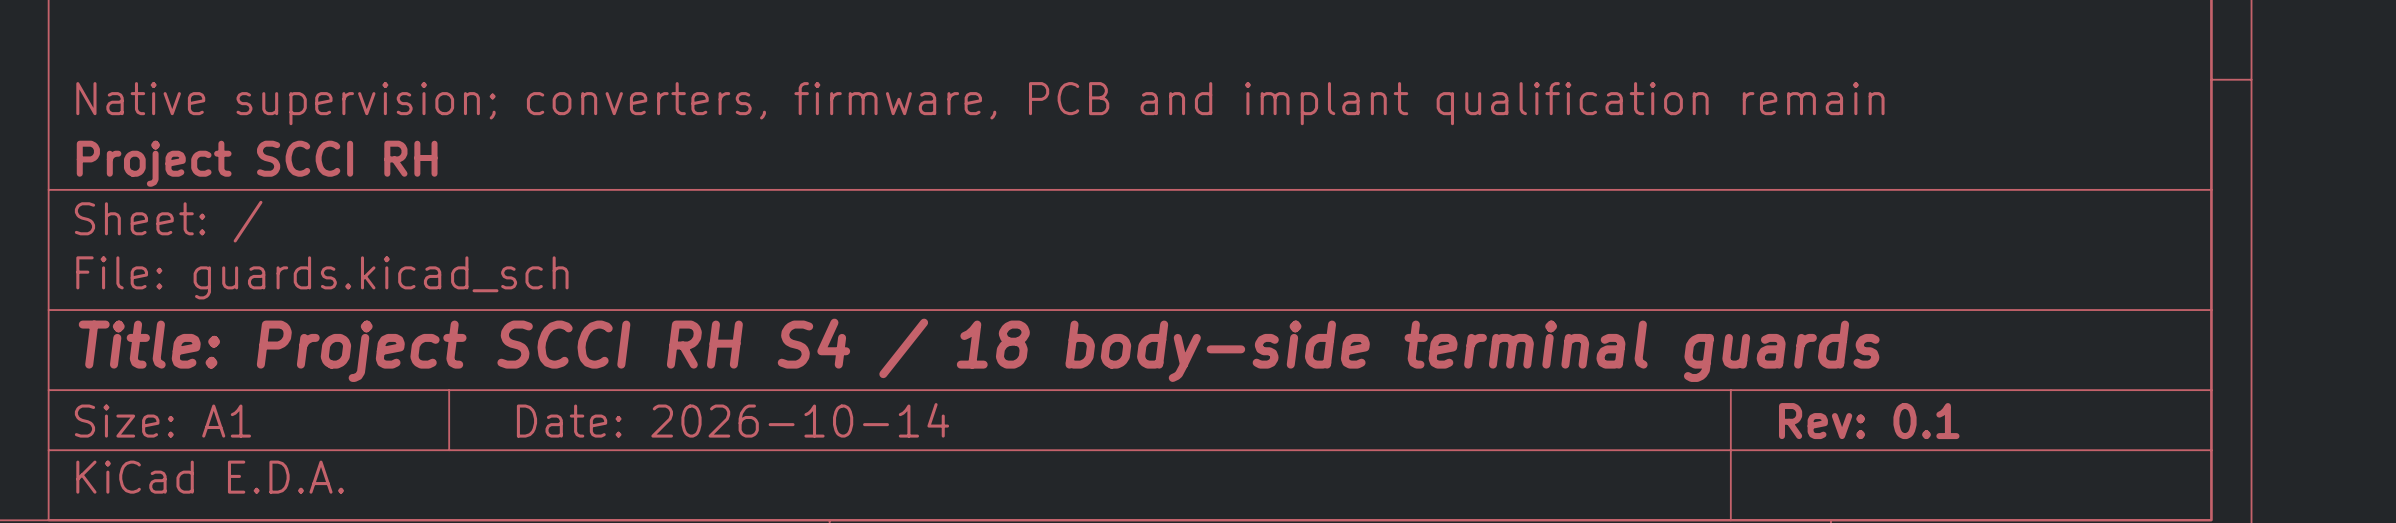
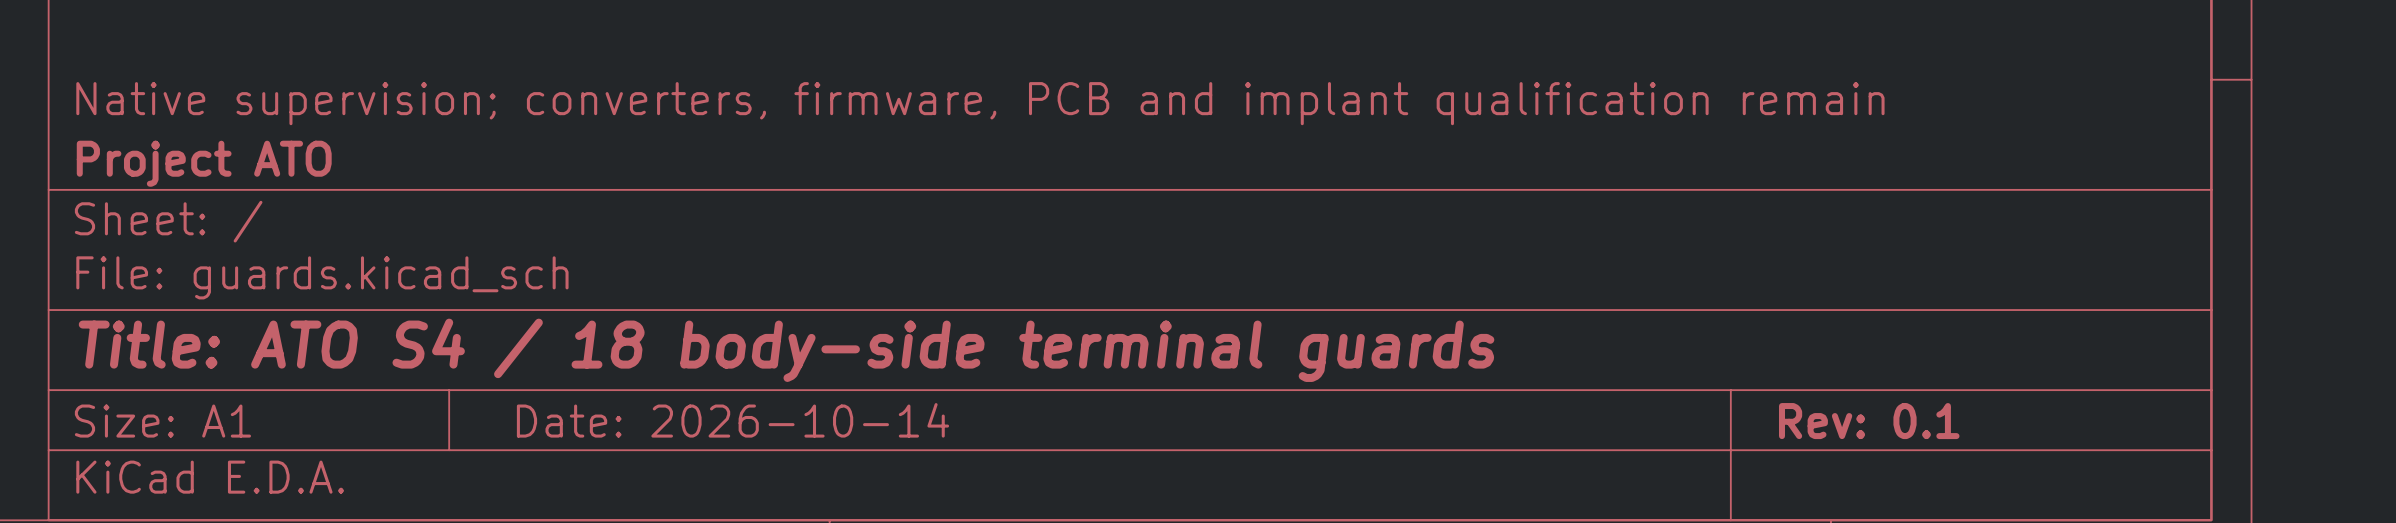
title block: Project SCCI RH (257, 163) -> Project ATO (204, 163)
title block: Title: Project SCCI RH S4 / 18 body-side terminal guards (979, 350) -> Title: ATO S4 / 18 body-side terminal guards (786, 350)

